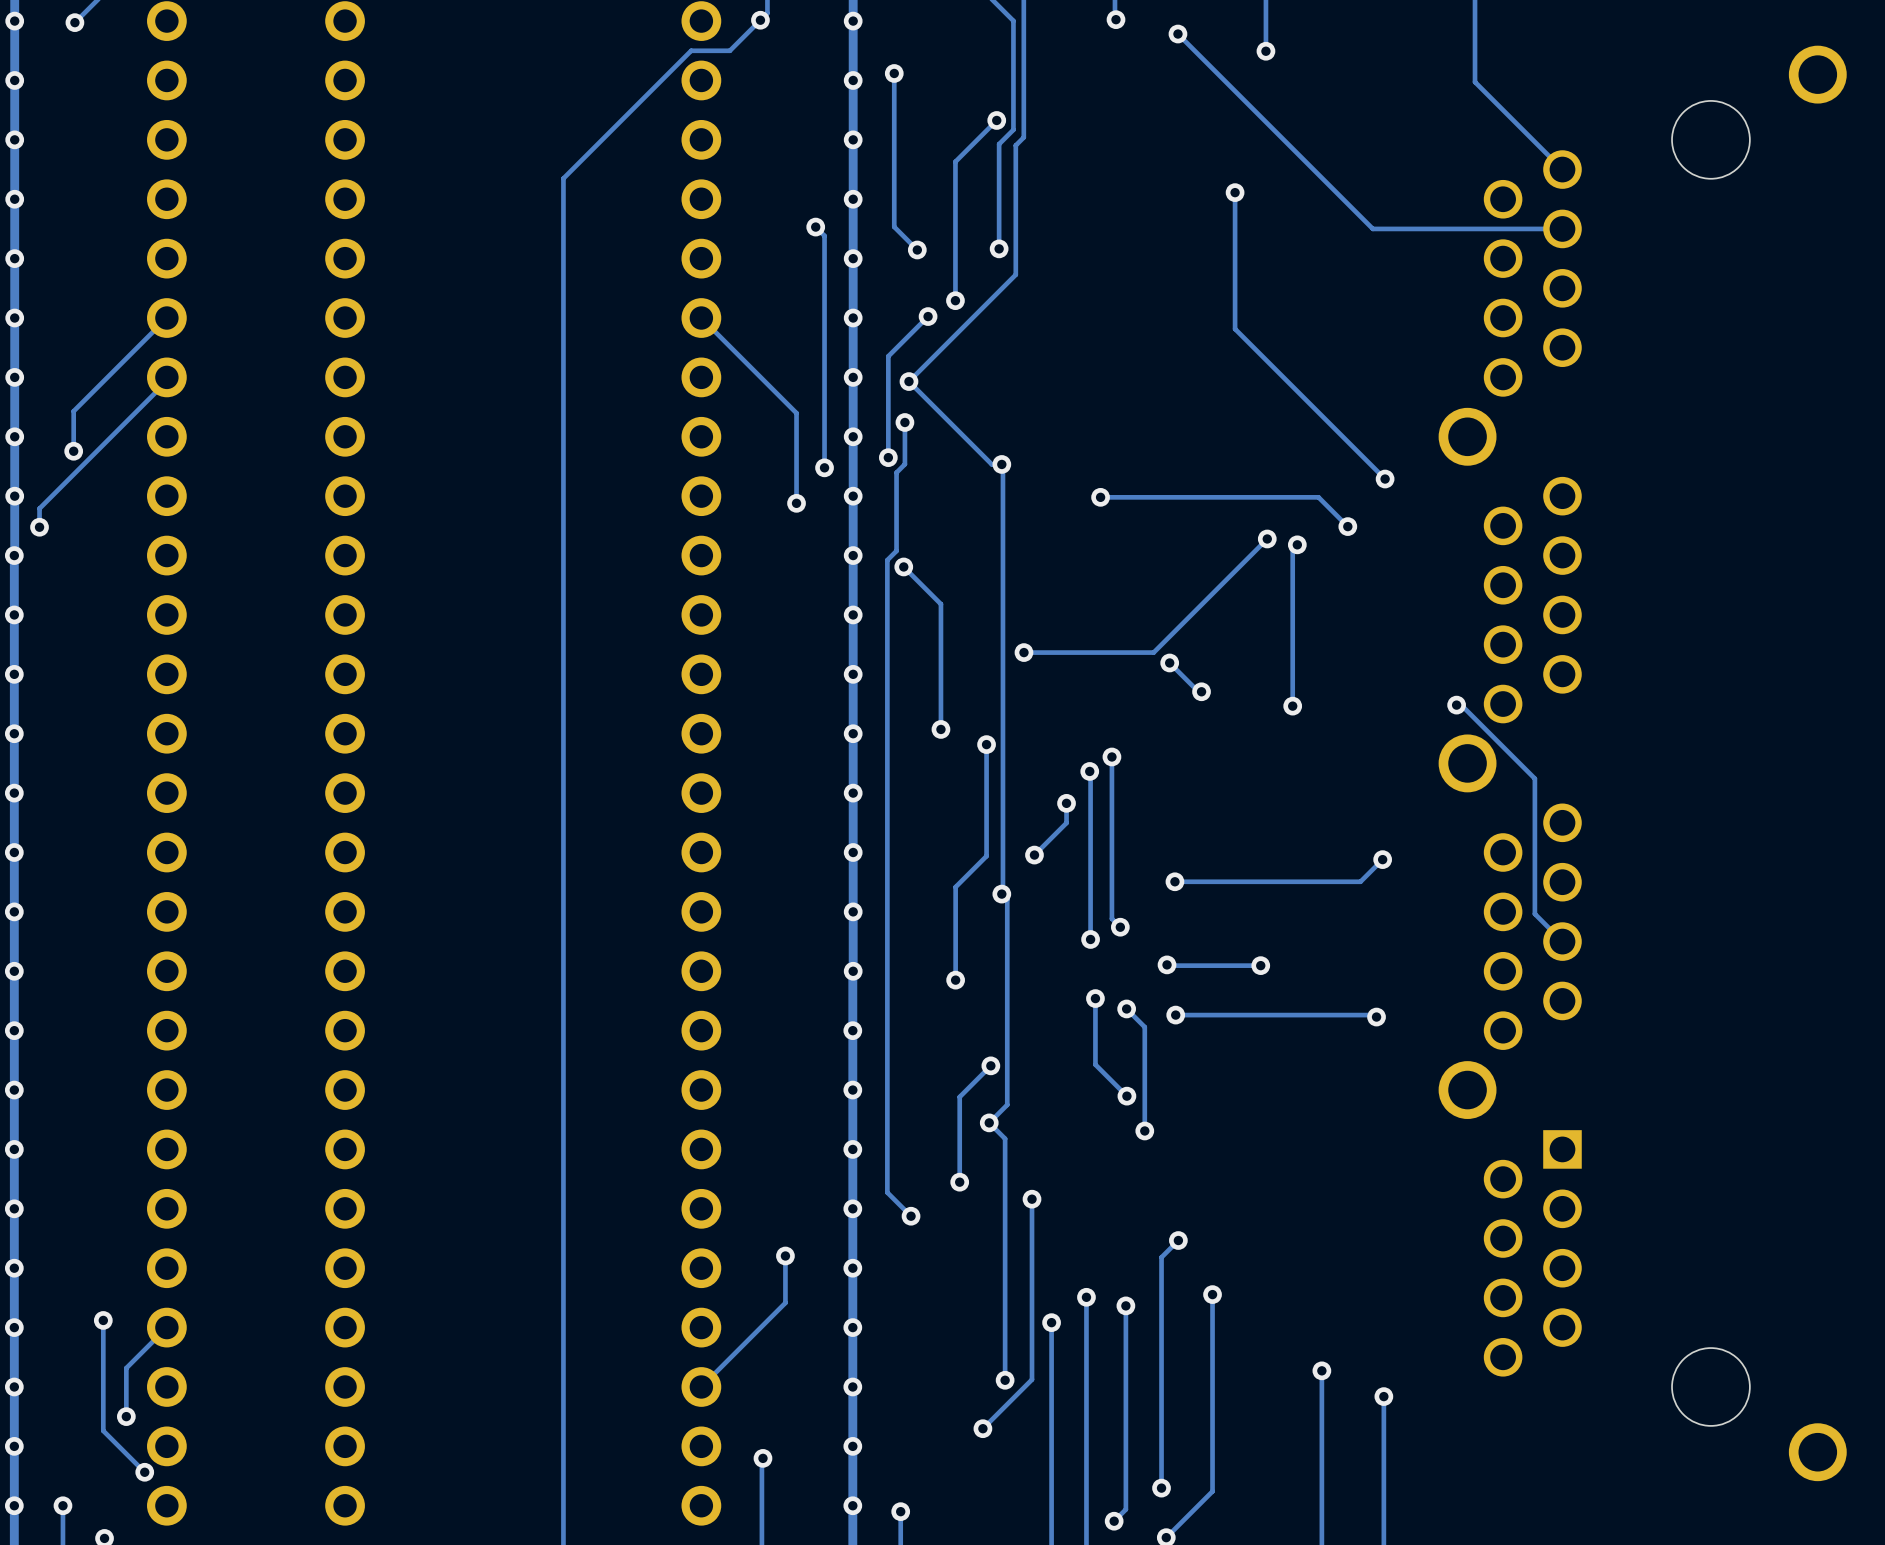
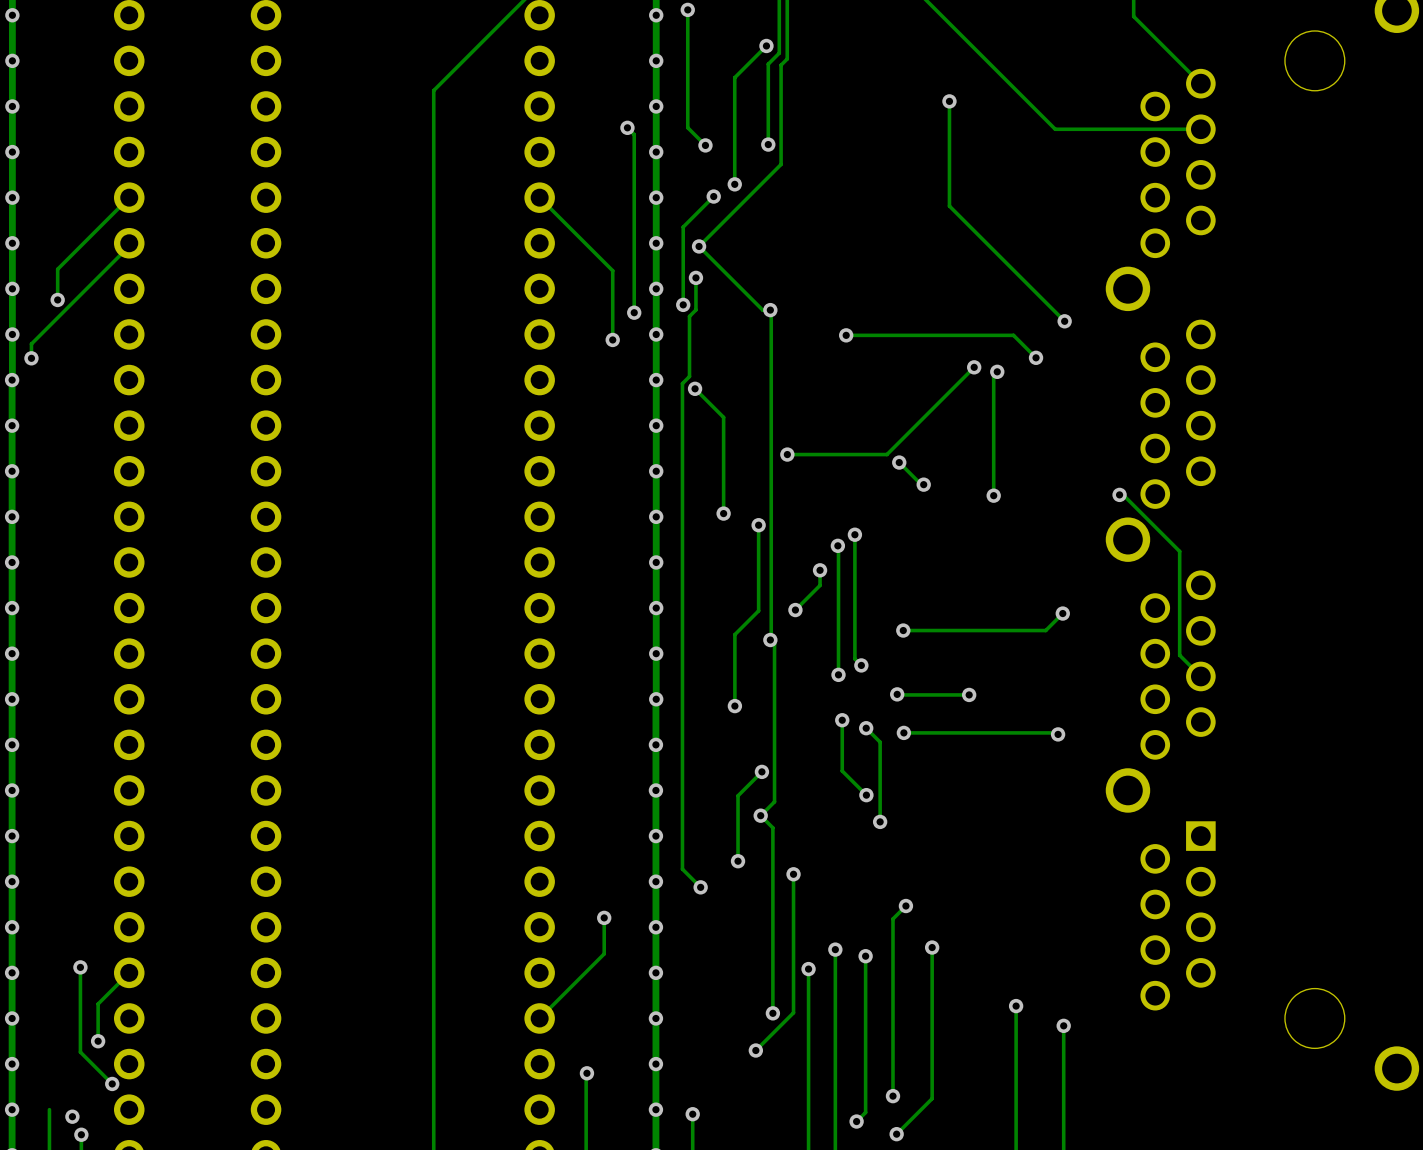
via position: (62, 1505) -> (72, 1116)

